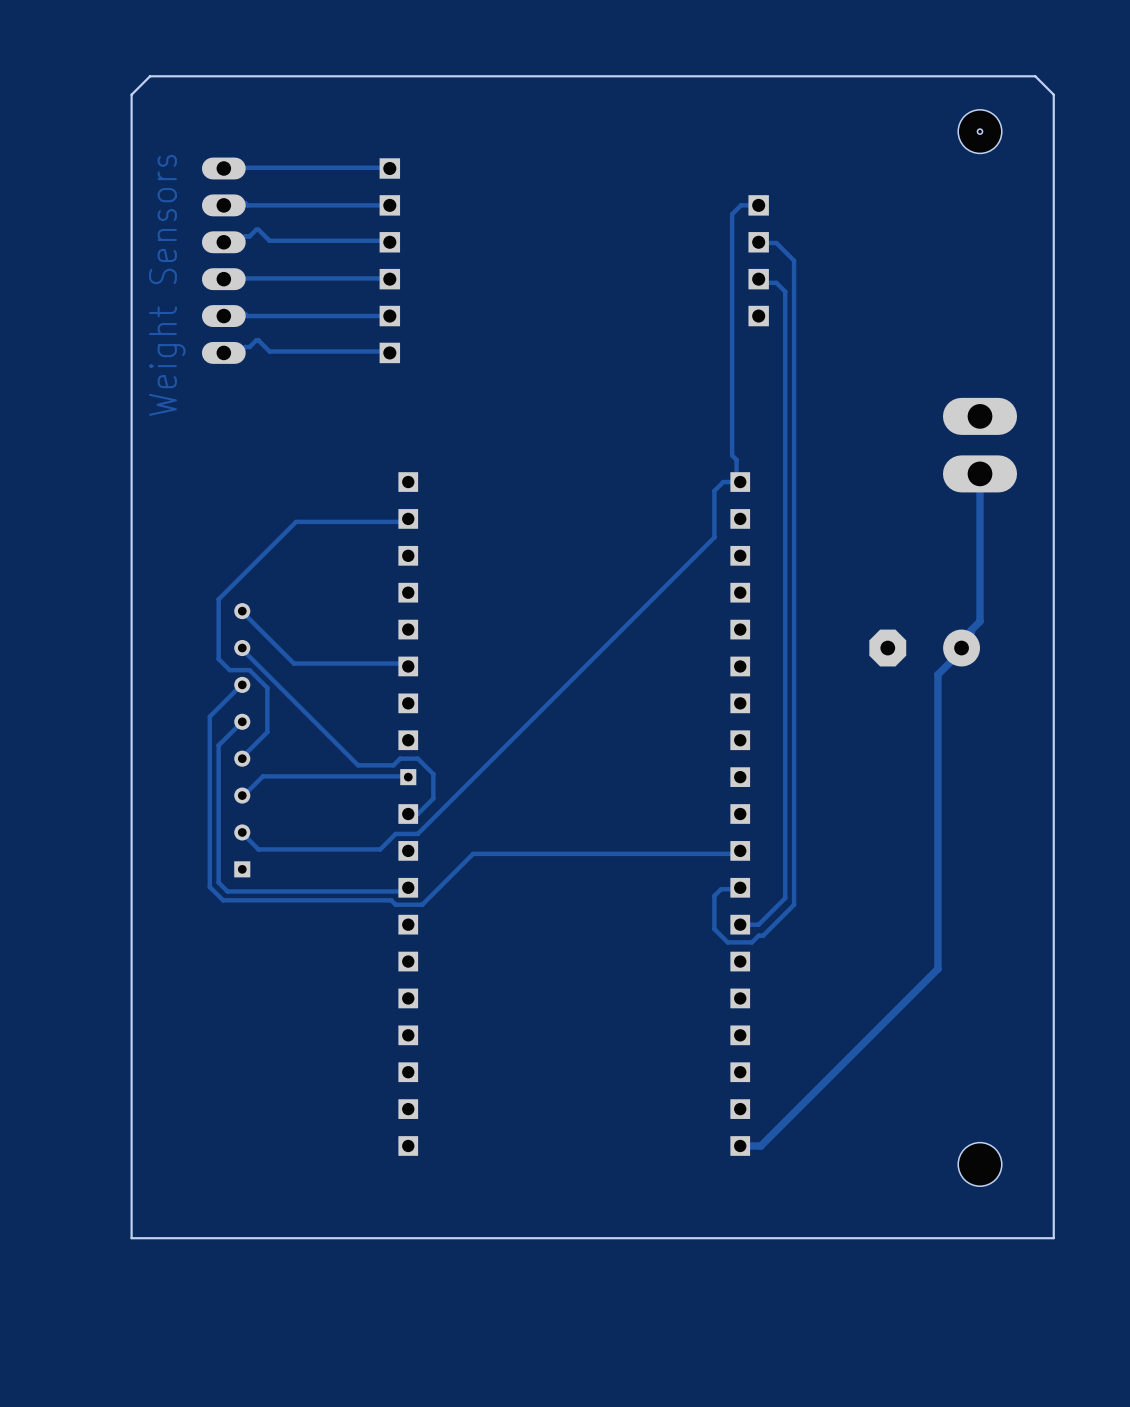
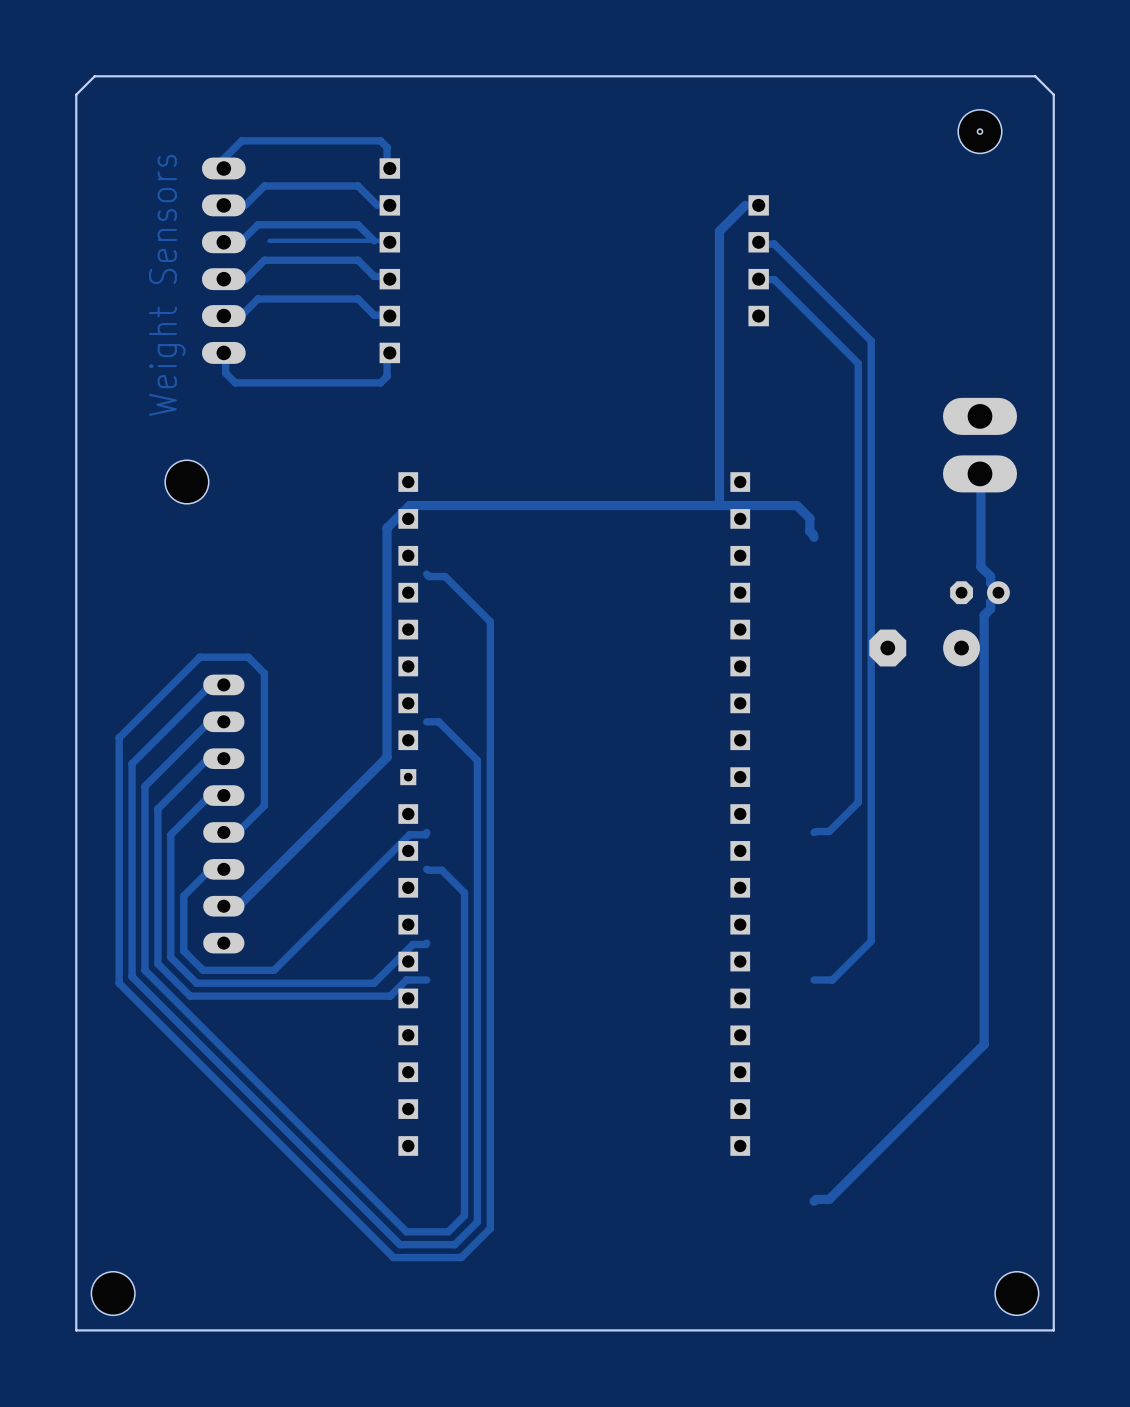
board edge: (150, 76) (131, 94) (131, 1238) (1053, 1238) -> (150, 76) (94, 76) (76, 94) (76, 1330) (1053, 1330) (1053, 1238)
track: (389, 168) (223, 168) -> (389, 168) (387, 166) (387, 147) (380, 140) (241, 140) (222, 160) (223, 168)
track: (377, 205) (247, 205) (245, 203) (227, 203) (225, 205) -> (377, 205) (358, 186) (264, 186) (245, 205) (225, 205)
track: (745, 205) (740, 205) (732, 214) (732, 455) (736, 459) (736, 482) -> (745, 205) (719, 231) (719, 505)
track: (269, 240) (258, 229) (240, 240) -> none
track: none -> (374, 240) (358, 224) (257, 224) (241, 240)
track: (758, 242) (776, 243) (794, 260) (794, 904) (763, 935) (758, 935) (752, 942) (727, 942) (714, 929) (714, 895) (721, 889) (740, 887) -> (758, 242) (761, 244) (774, 244) (871, 340) (871, 941) (832, 980) (814, 980)
track: (389, 278) (223, 279) -> (389, 278) (387, 276) (374, 276) (358, 260) (264, 260) (245, 279) (223, 279)
track: (758, 279) (760, 282) (776, 282) (785, 291) (785, 898) (758, 924) (740, 924) -> (758, 279) (774, 279) (858, 363) (858, 802) (829, 831) (814, 832)
track: (389, 316) (247, 316) (245, 313) (227, 313) (223, 316) -> (389, 316) (374, 315) (358, 298) (257, 298) (241, 315) (223, 316)
track: (389, 352) (269, 351) (258, 340) (240, 351) (223, 352) -> (389, 352) (387, 353) (387, 376) (380, 382) (235, 382) (225, 373) (225, 353) (223, 352)
track: (980, 473) (980, 621) (964, 639) (964, 645) (960, 648) (960, 652) (937, 674) (937, 968) (760, 1145) (740, 1145) -> (980, 473) (980, 566) (990, 576) (993, 592) (1000, 592) (990, 602) (990, 608) (984, 615) (984, 1044) (829, 1199) (816, 1199) (814, 1201)
hole: none -> (186, 482)
track: (740, 482) (723, 482) (714, 490) (714, 537) (417, 833) (395, 833) (380, 849) (258, 849) (242, 832) -> none
track: (408, 518) (404, 521) (296, 521) (218, 599) (218, 659) (229, 670) (249, 670) (267, 687) (267, 732) (242, 758) -> none
track: none -> (814, 537) (809, 531) (809, 518) (796, 505) (409, 505) (387, 528) (387, 757) (238, 905) (223, 906)
track: none -> (426, 574) (429, 576) (445, 576) (490, 621) (490, 1228) (461, 1257) (393, 1257) (119, 983) (119, 737) (199, 657) (248, 657) (264, 673) (264, 805) (238, 831) (223, 832)
part: none -> (980, 592)
track: (242, 611) (293, 663) (404, 663) (408, 666) -> none
track: (242, 648) (358, 765) (393, 765) (400, 758) (417, 758) (433, 774) (433, 798) (417, 814) (408, 814) -> none
track: none -> (223, 684) (209, 686) (132, 763) (132, 976) (399, 1244) (454, 1244) (477, 1222) (477, 760) (438, 721) (426, 721)
track: (242, 684) (209, 716) (209, 887) (223, 900) (391, 900) (395, 904) (422, 904) (473, 853) (736, 853) (740, 850) -> none
track: none -> (223, 721) (209, 721) (144, 786) (144, 970) (406, 1231) (448, 1231) (464, 1215) (464, 892) (441, 870) (426, 869)
track: (242, 721) (218, 745) (218, 882) (227, 891) (404, 891) (408, 887) -> none
part: (242, 740) -> none
track: none -> (223, 758) (222, 760) (206, 760) (157, 808) (157, 963) (190, 996) (390, 996) (406, 980) (426, 980)
track: (408, 777) (262, 776) (242, 795) -> none
track: none -> (223, 795) (209, 796) (170, 834) (170, 957) (196, 983) (374, 983) (412, 944) (426, 943)
part: none -> (223, 814)
track: none -> (426, 832) (425, 834) (409, 834) (274, 970) (203, 970) (183, 950) (183, 896) (209, 870) (223, 869)
hole position: (980, 1164) -> (1016, 1293)
hole: none -> (113, 1293)

